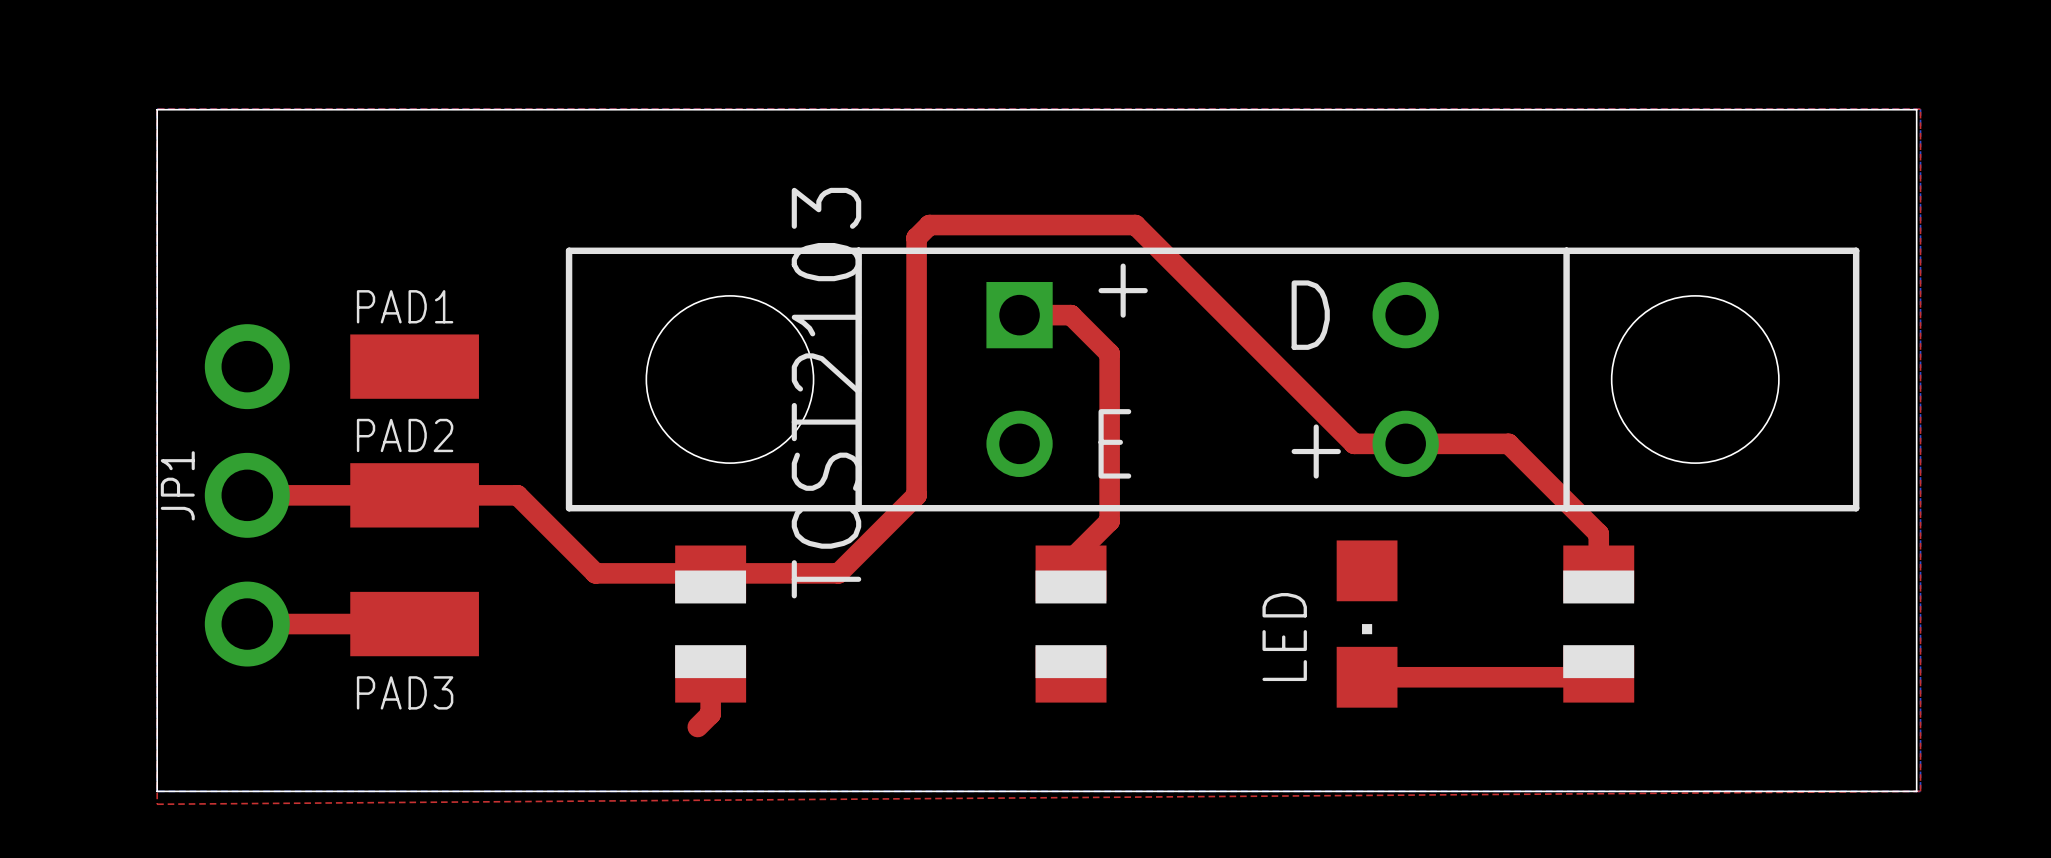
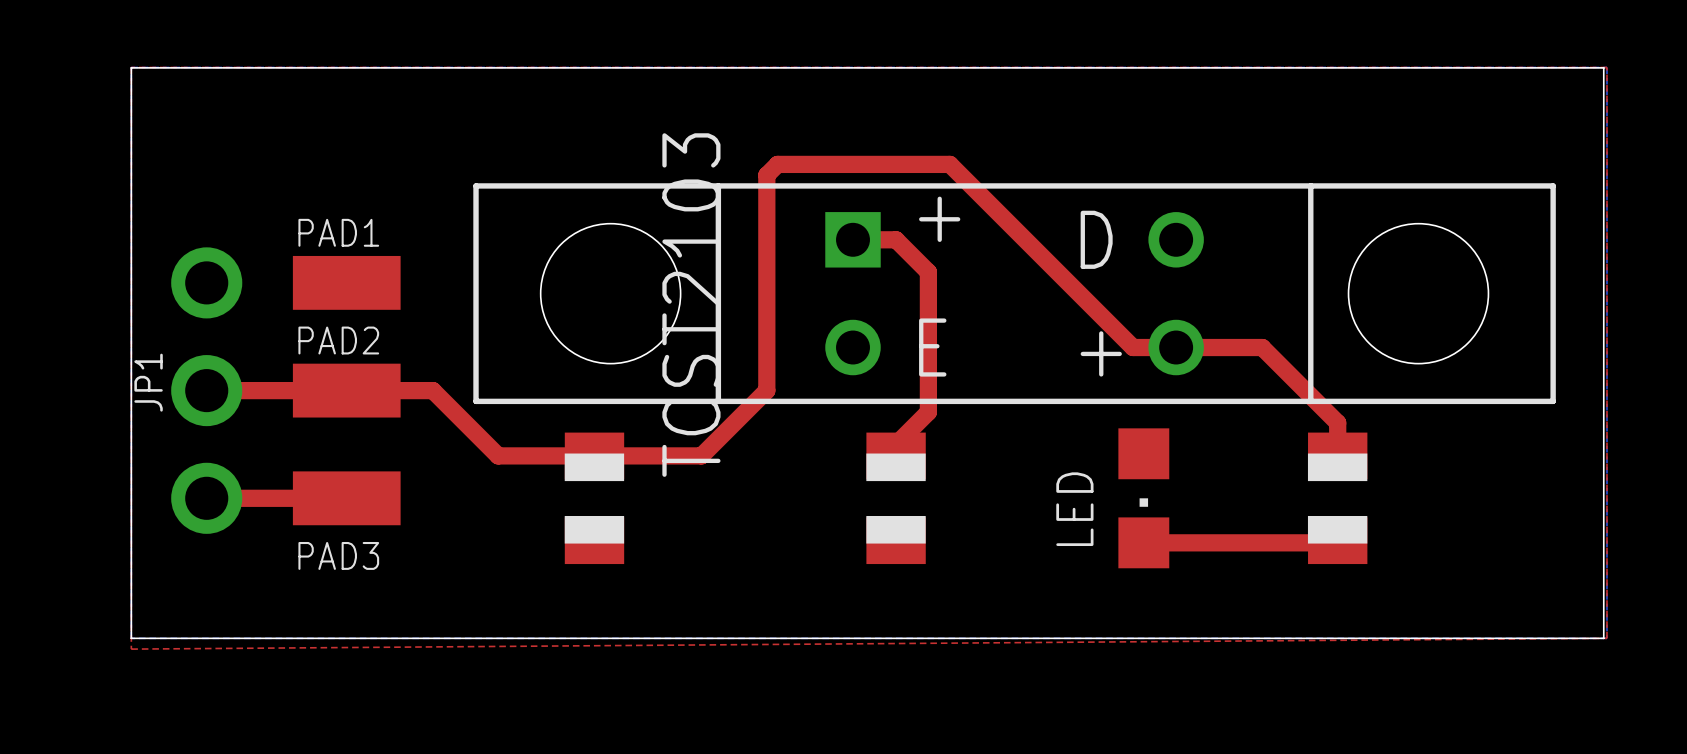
top track: (710, 674) (710, 714) (697, 727) -> none

